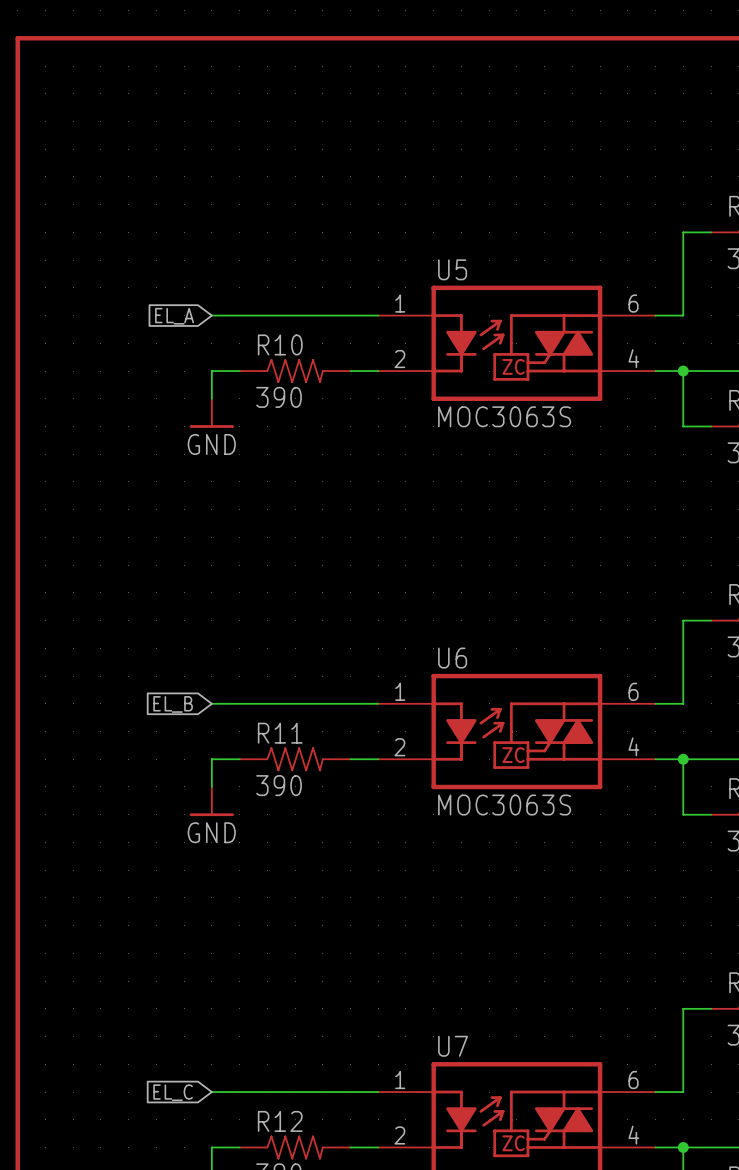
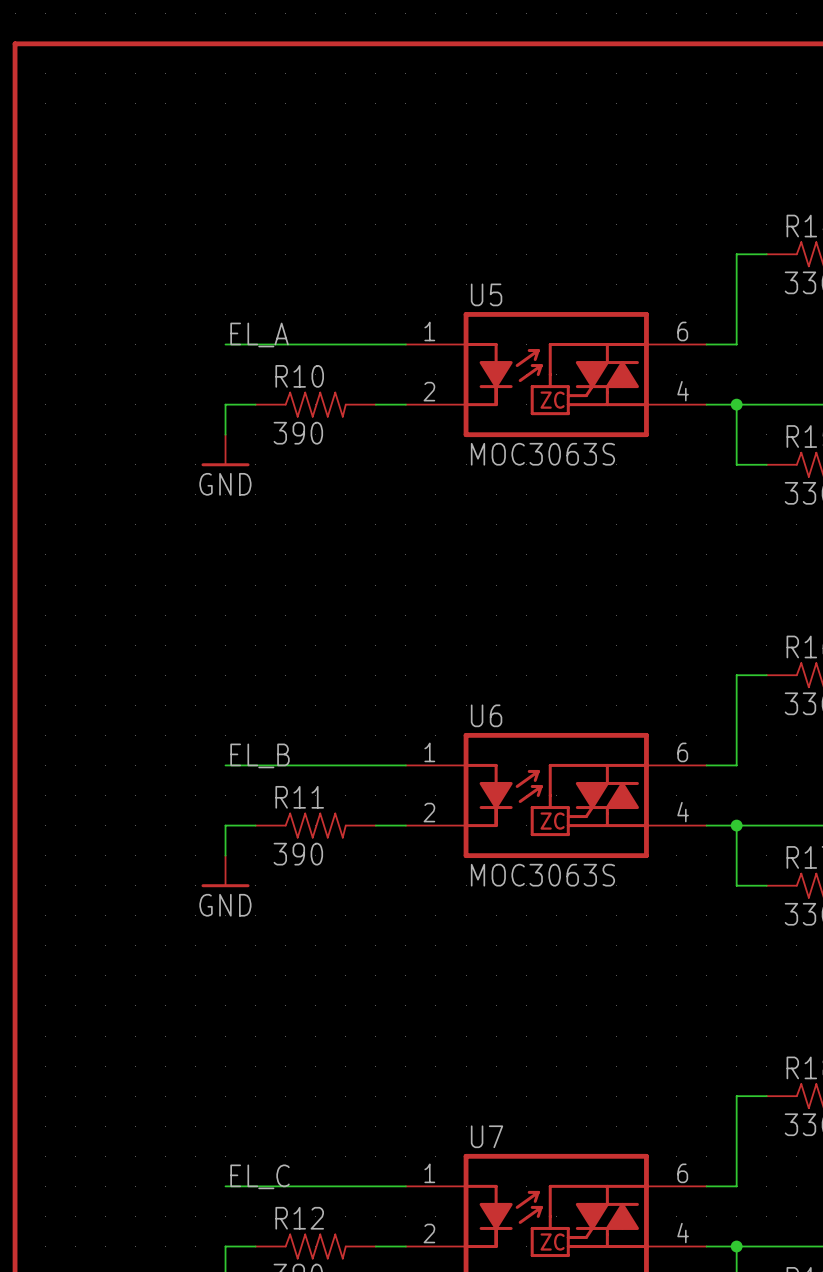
label: none -> EL_A (259, 334)
global label: EL_A (174, 316) -> none
label: none -> EL_B (260, 755)
global label: EL_B (173, 704) -> none
label: none -> EL_C (260, 1176)
global label: EL_C (173, 1092) -> none

